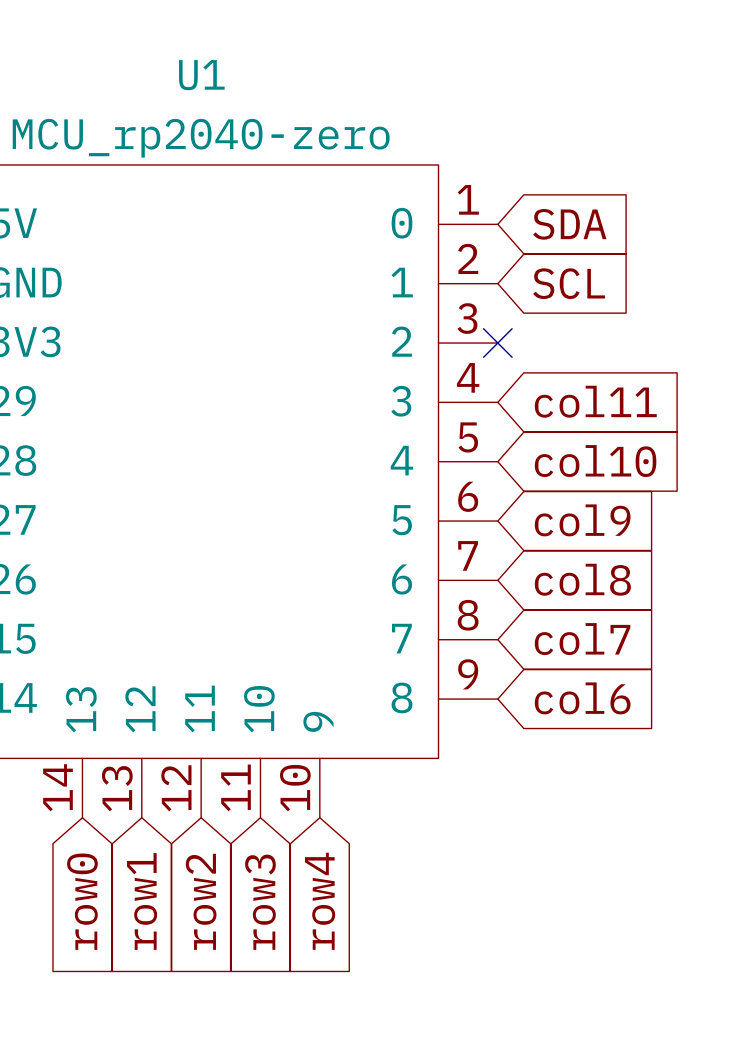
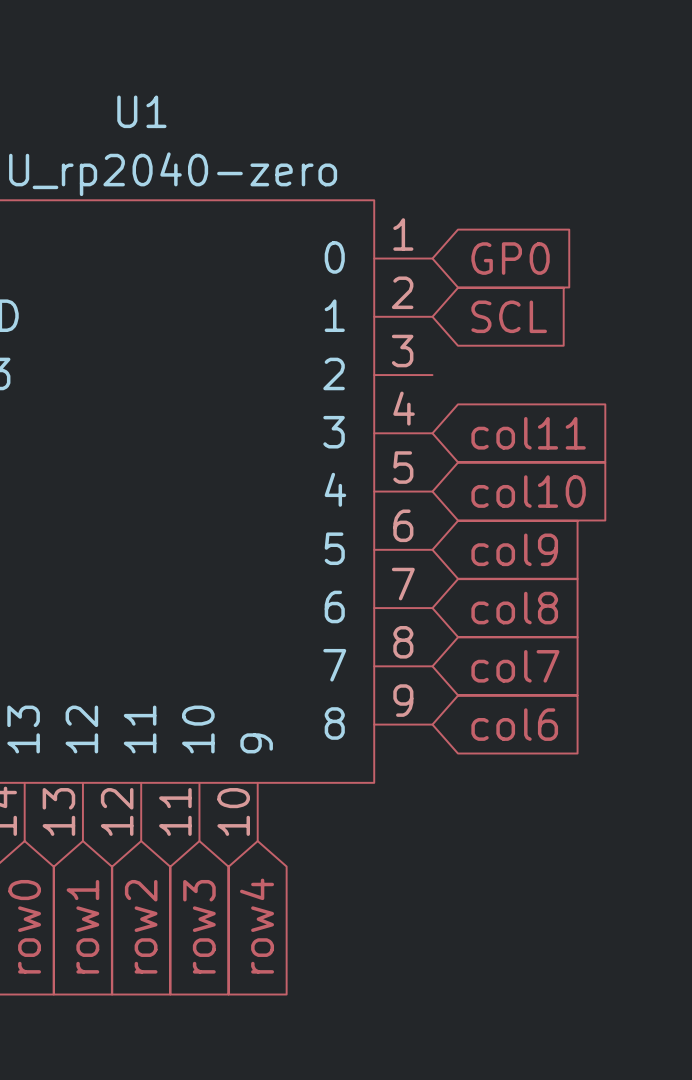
global label: SDA (569, 224) -> GP0 (510, 258)
no-connect mark: (497, 343) -> none

